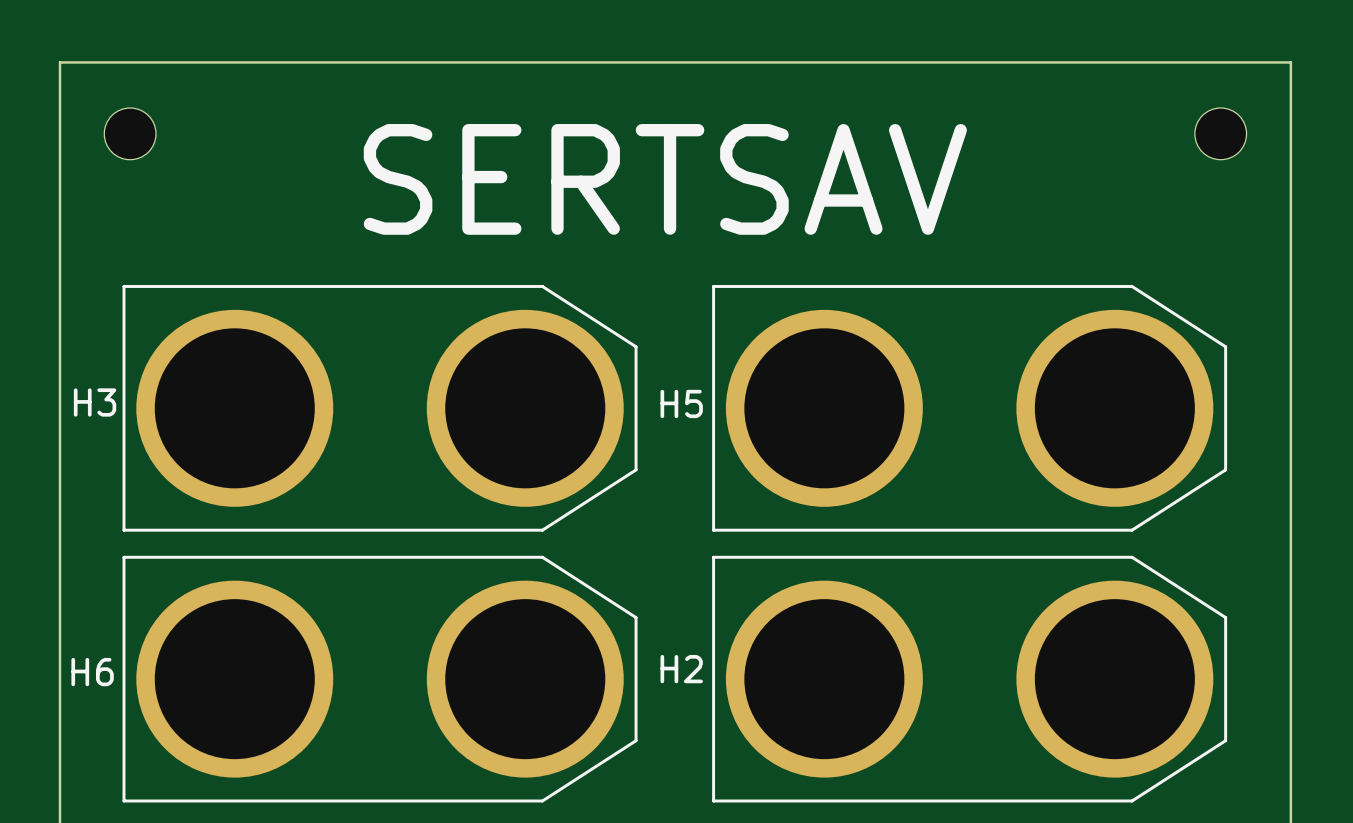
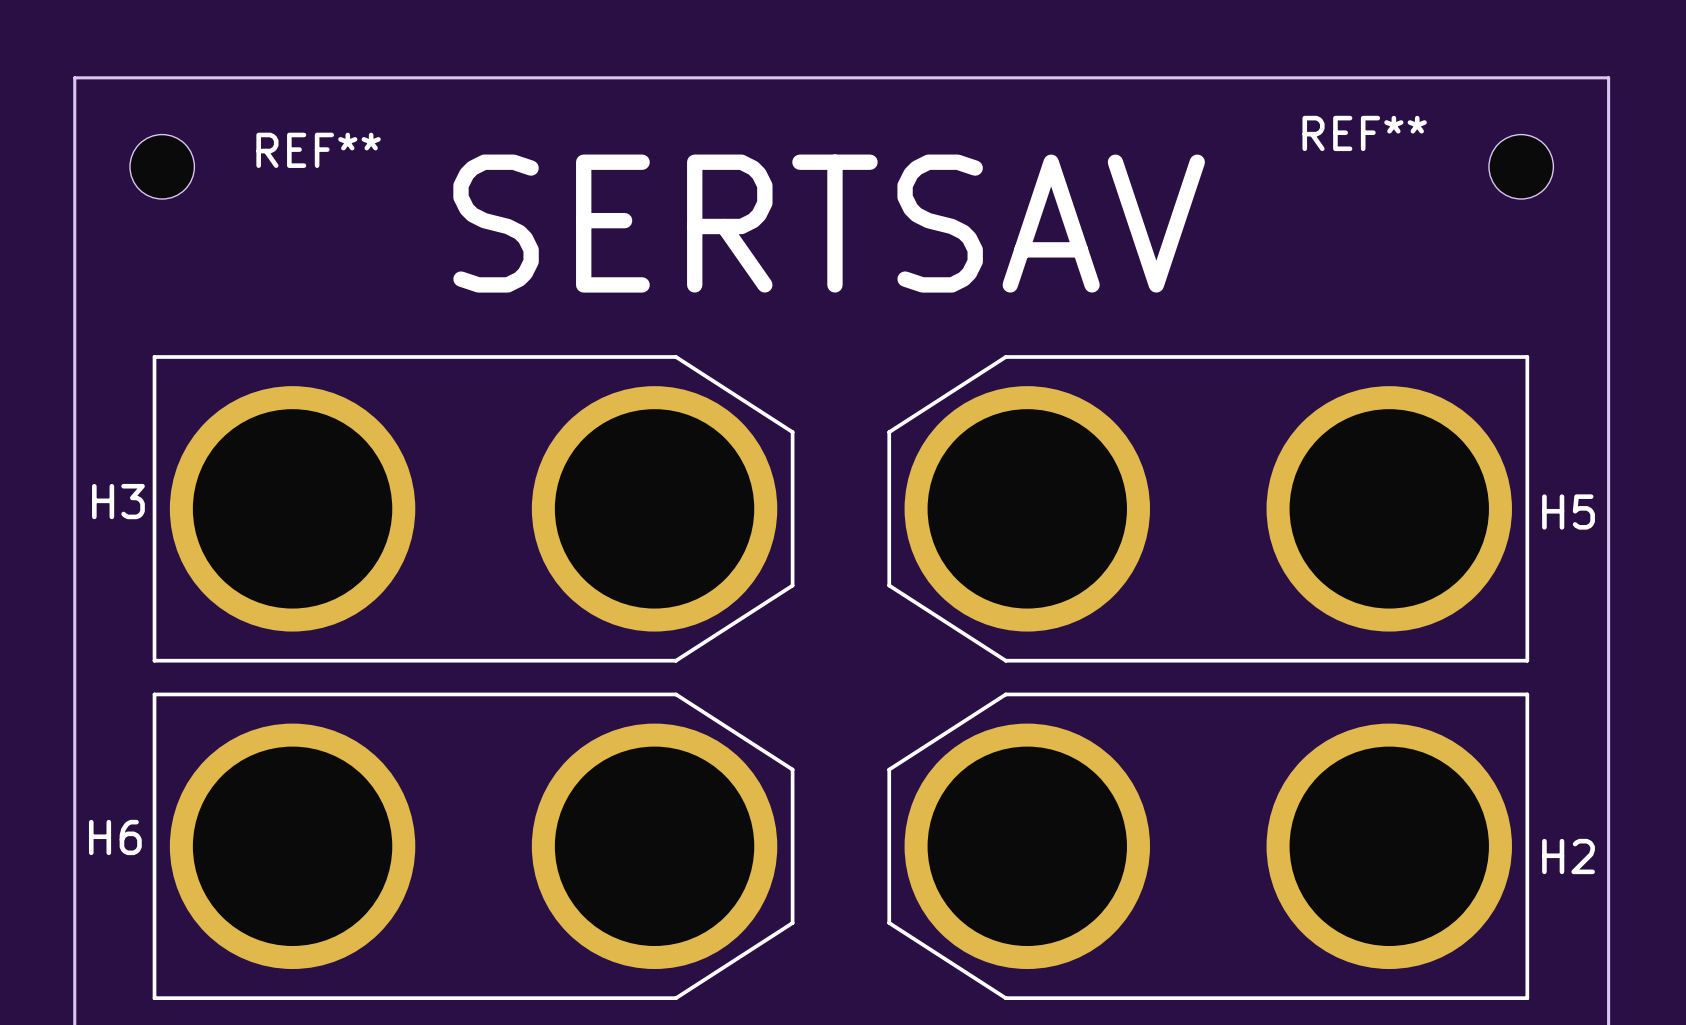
REF** name: none -> REF** (1364, 133)
REF** name: none -> REF** (318, 150)
H5 rotation: 0° (969, 408) -> 180° (1208, 508)
H2 rotation: 0° (969, 679) -> 180° (1208, 846)

